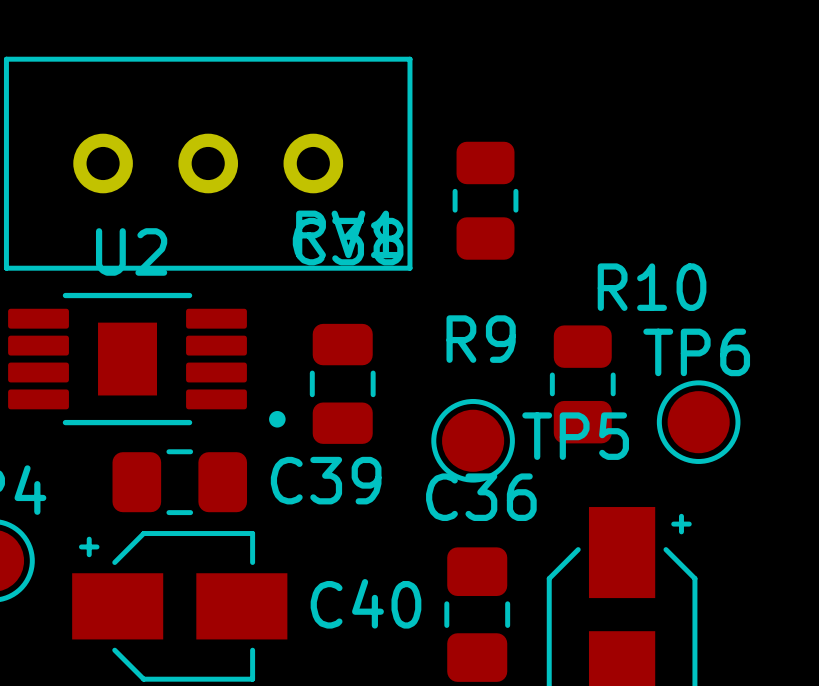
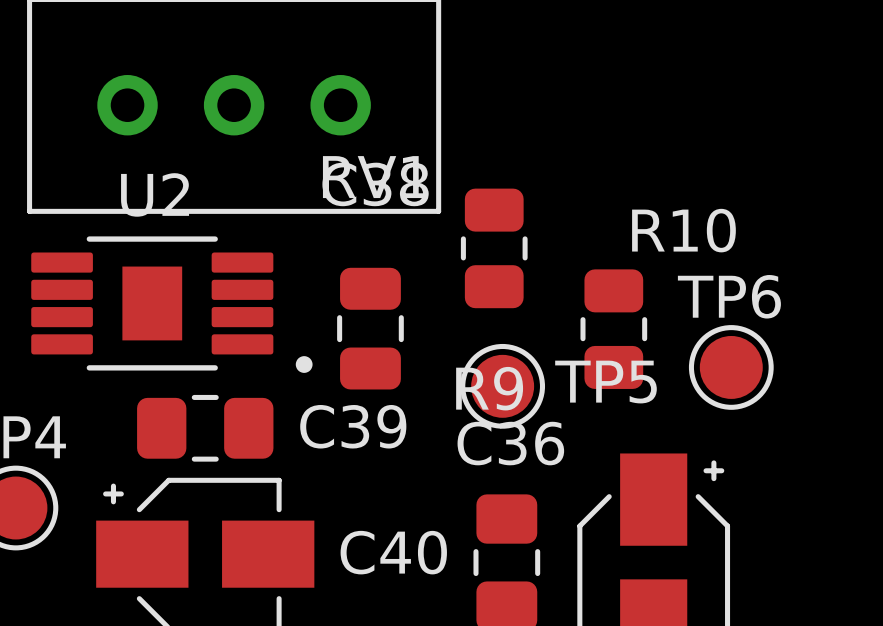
R9 position: (485, 200) -> (494, 248)

